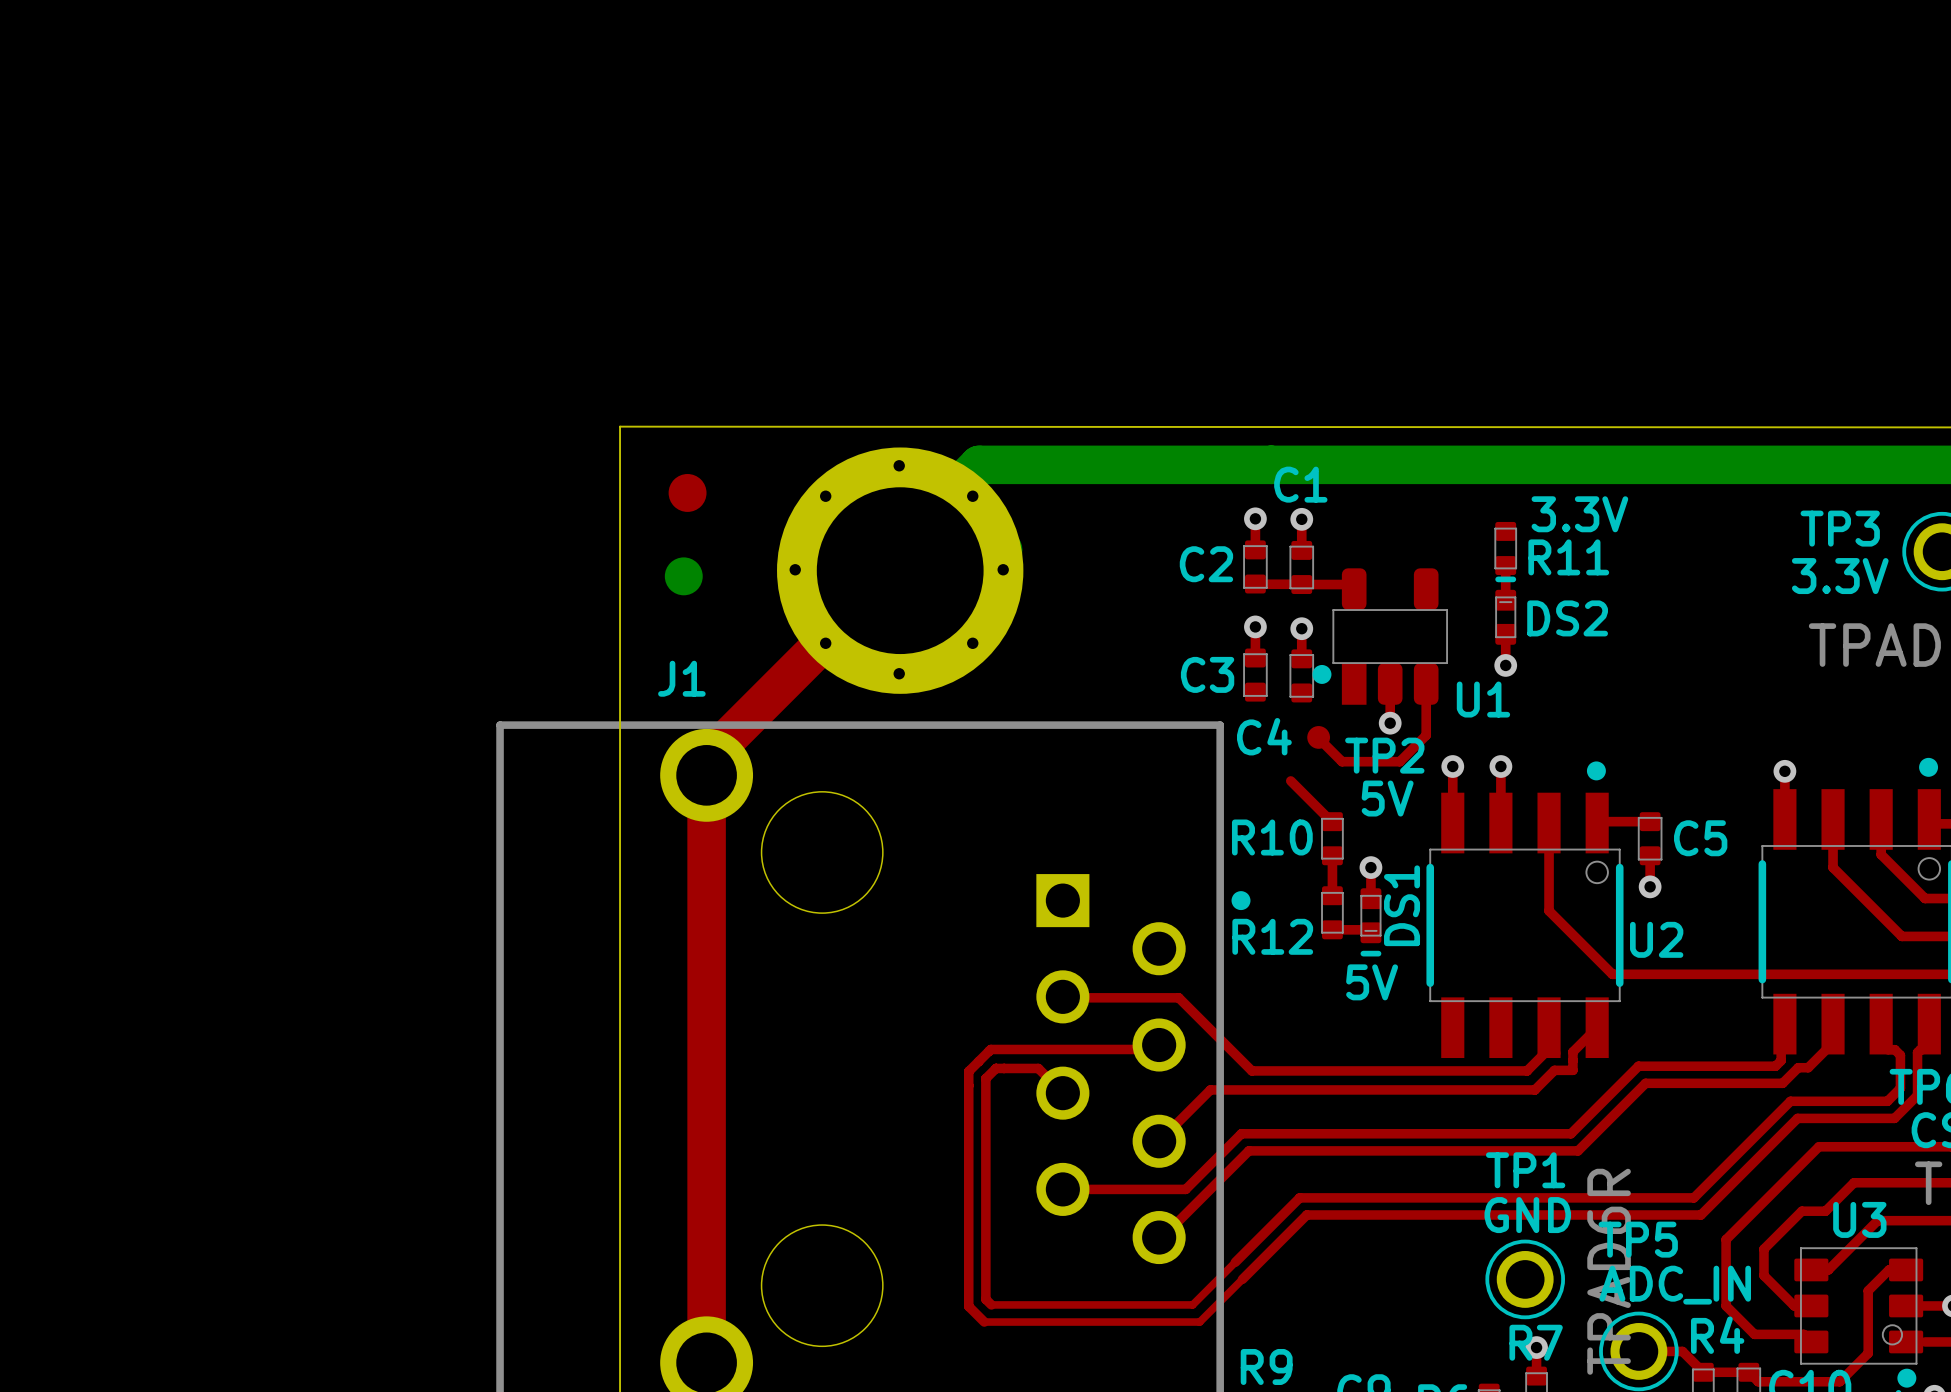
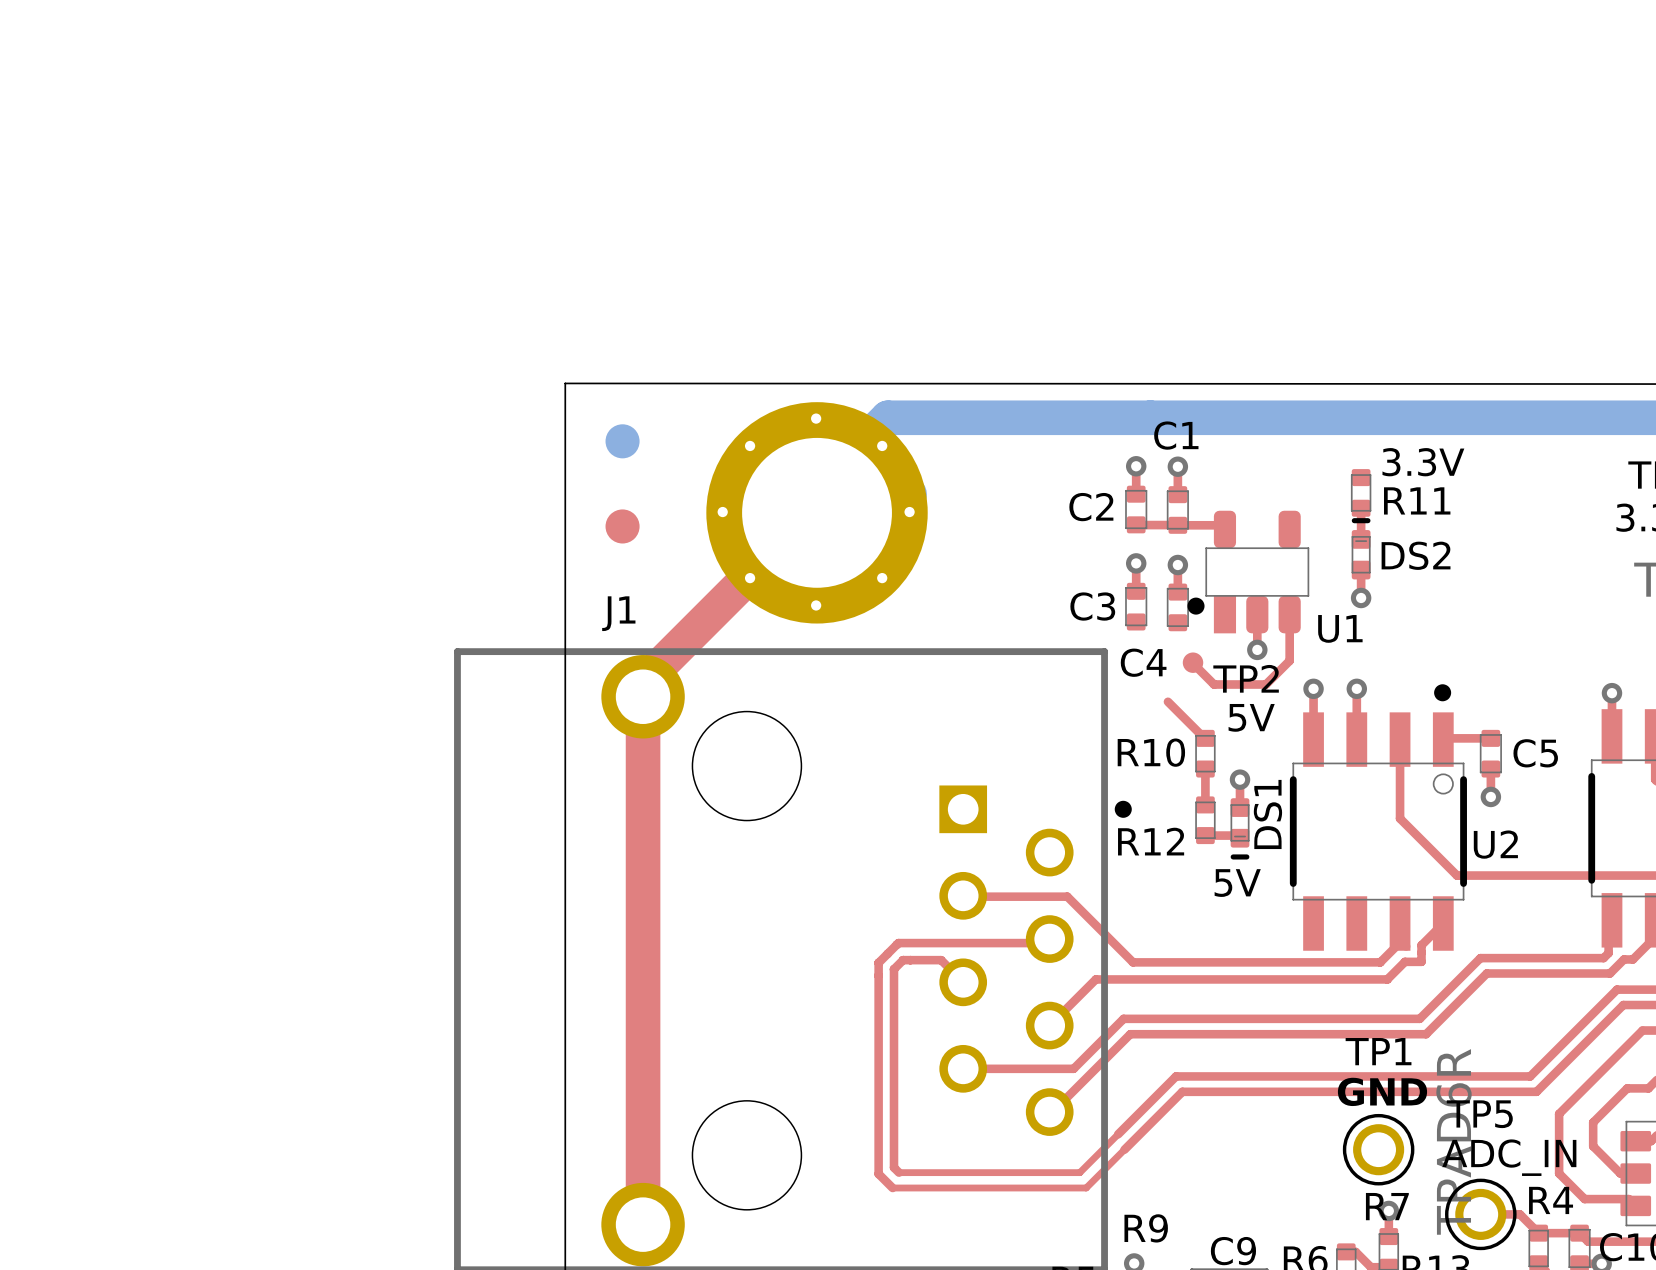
part side: top (687, 492) -> bottom (622, 441)
part side: bottom (683, 576) -> top (622, 526)

